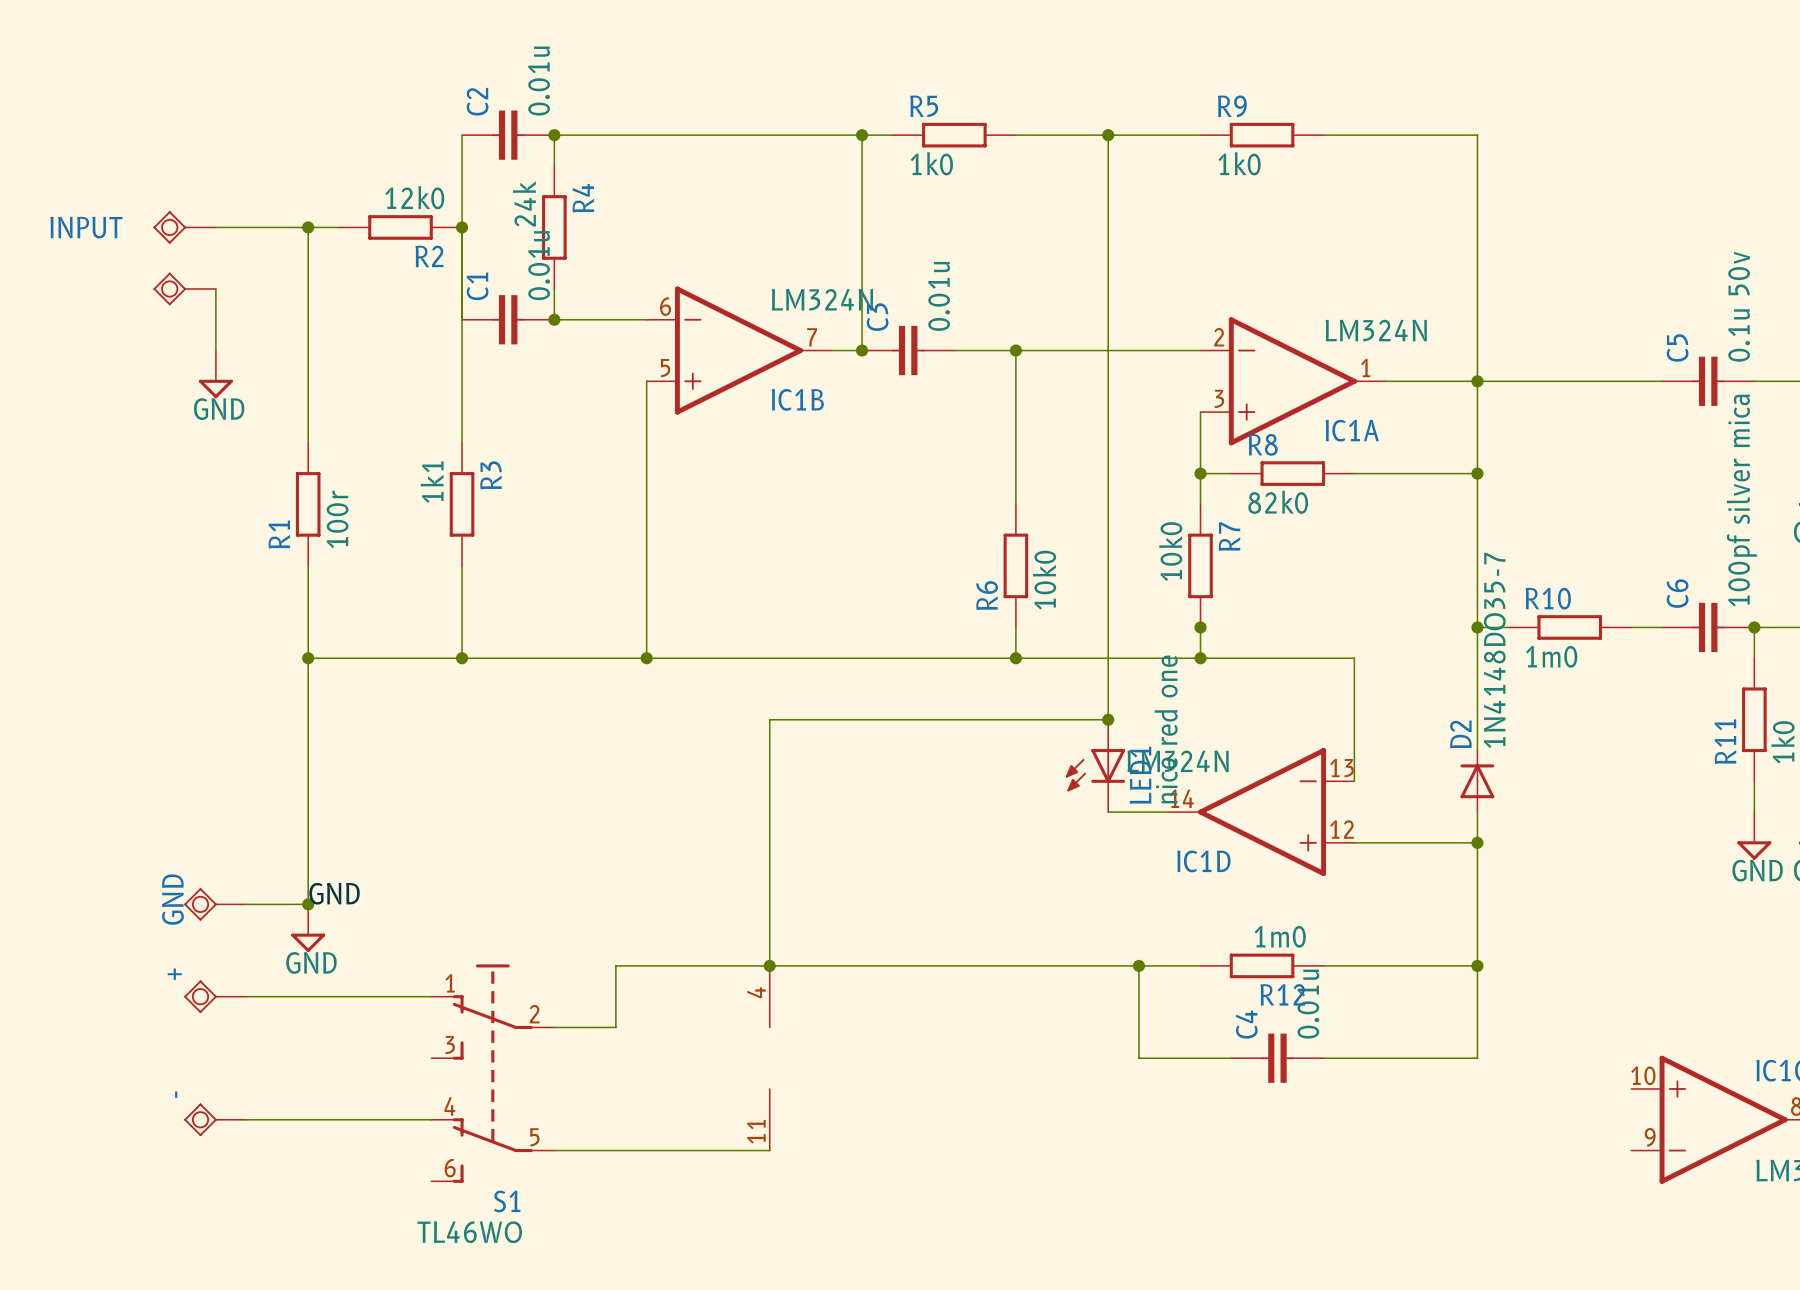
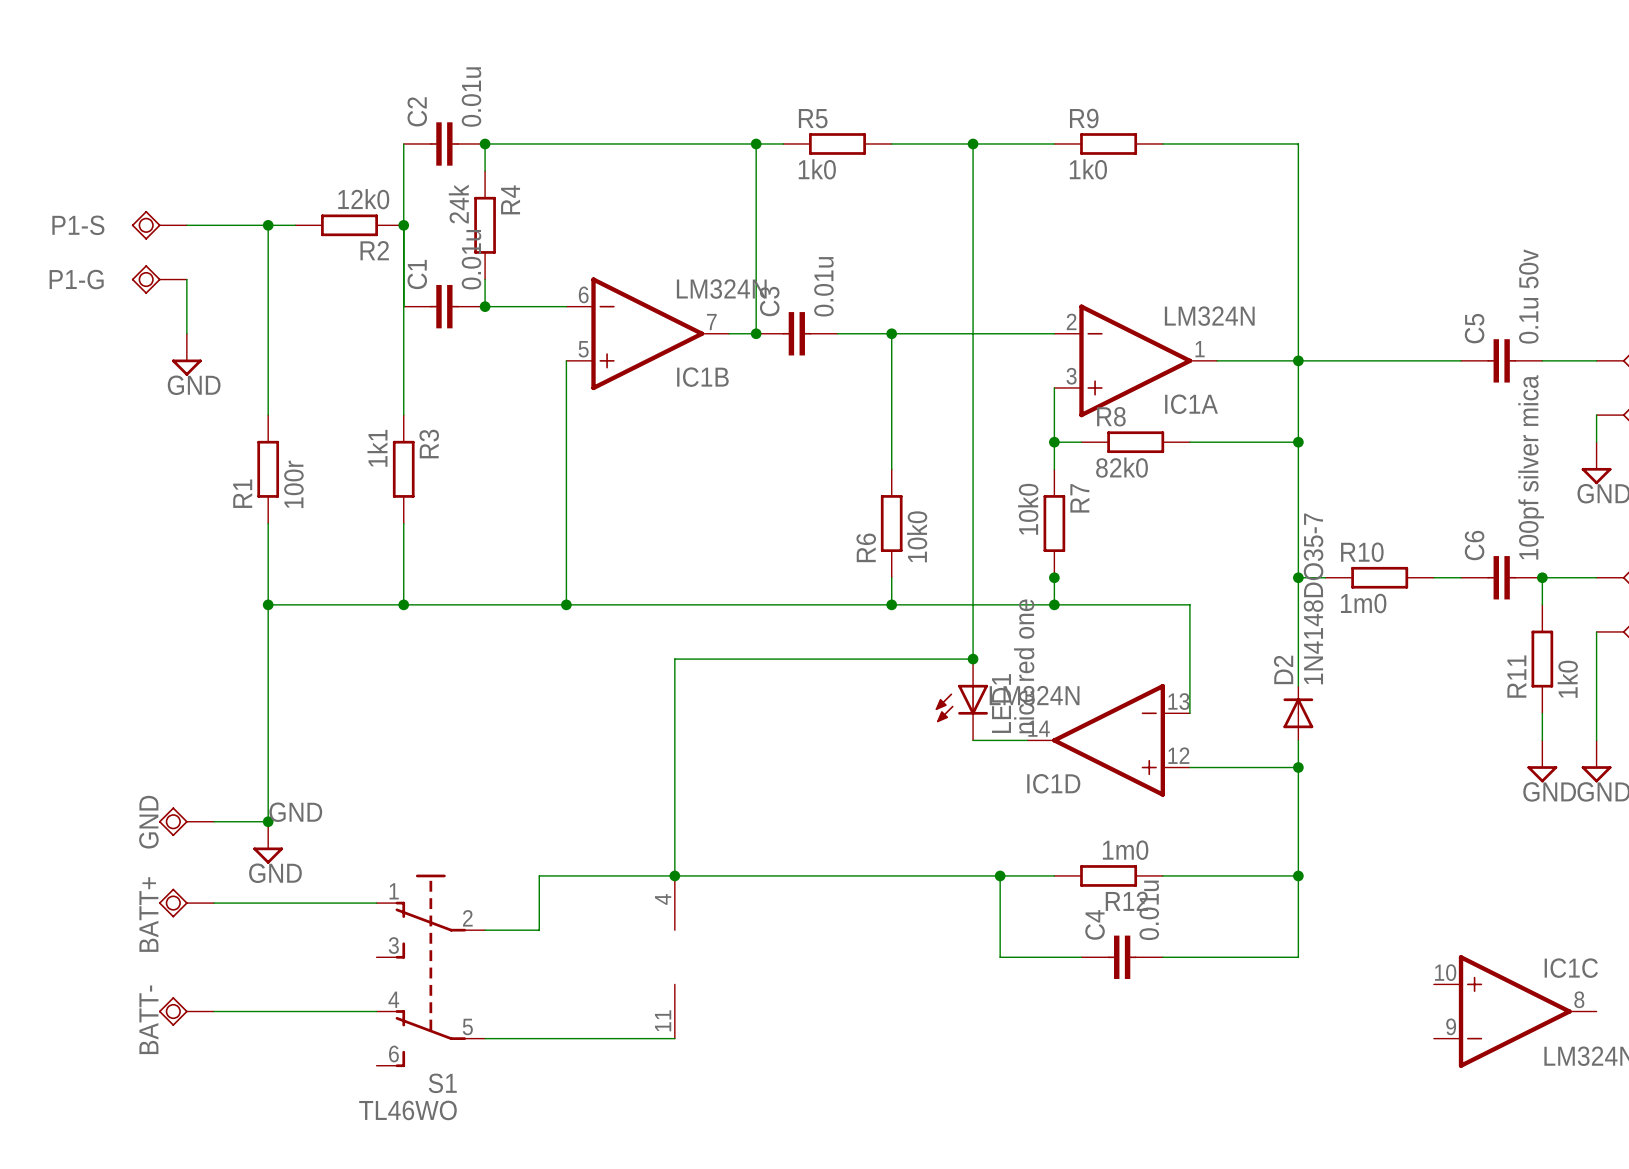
INPUT name: INPUT (86, 227) -> P1-S (78, 225)
P1-G name: none -> P1-G (76, 279)
BATT+ name: + (174, 974) -> BATT+ (148, 914)
BATT- name: - (176, 1094) -> BATT- (148, 1019)

